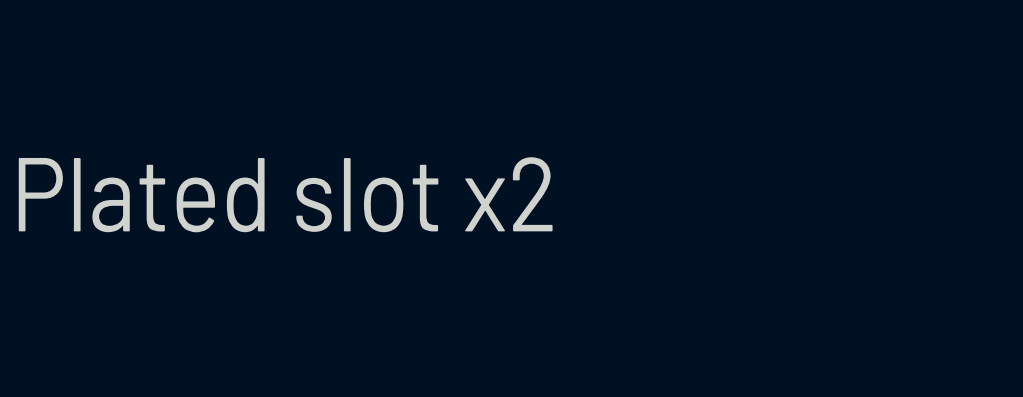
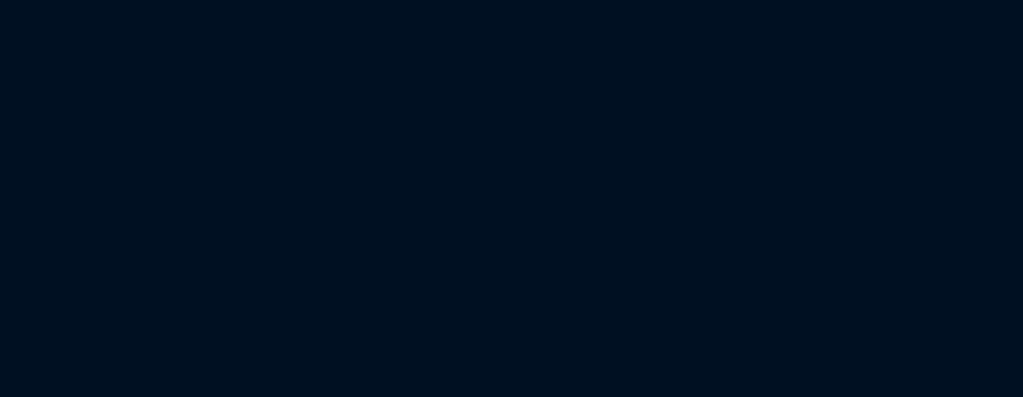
text: Plated slot x2 (285, 194) -> none

